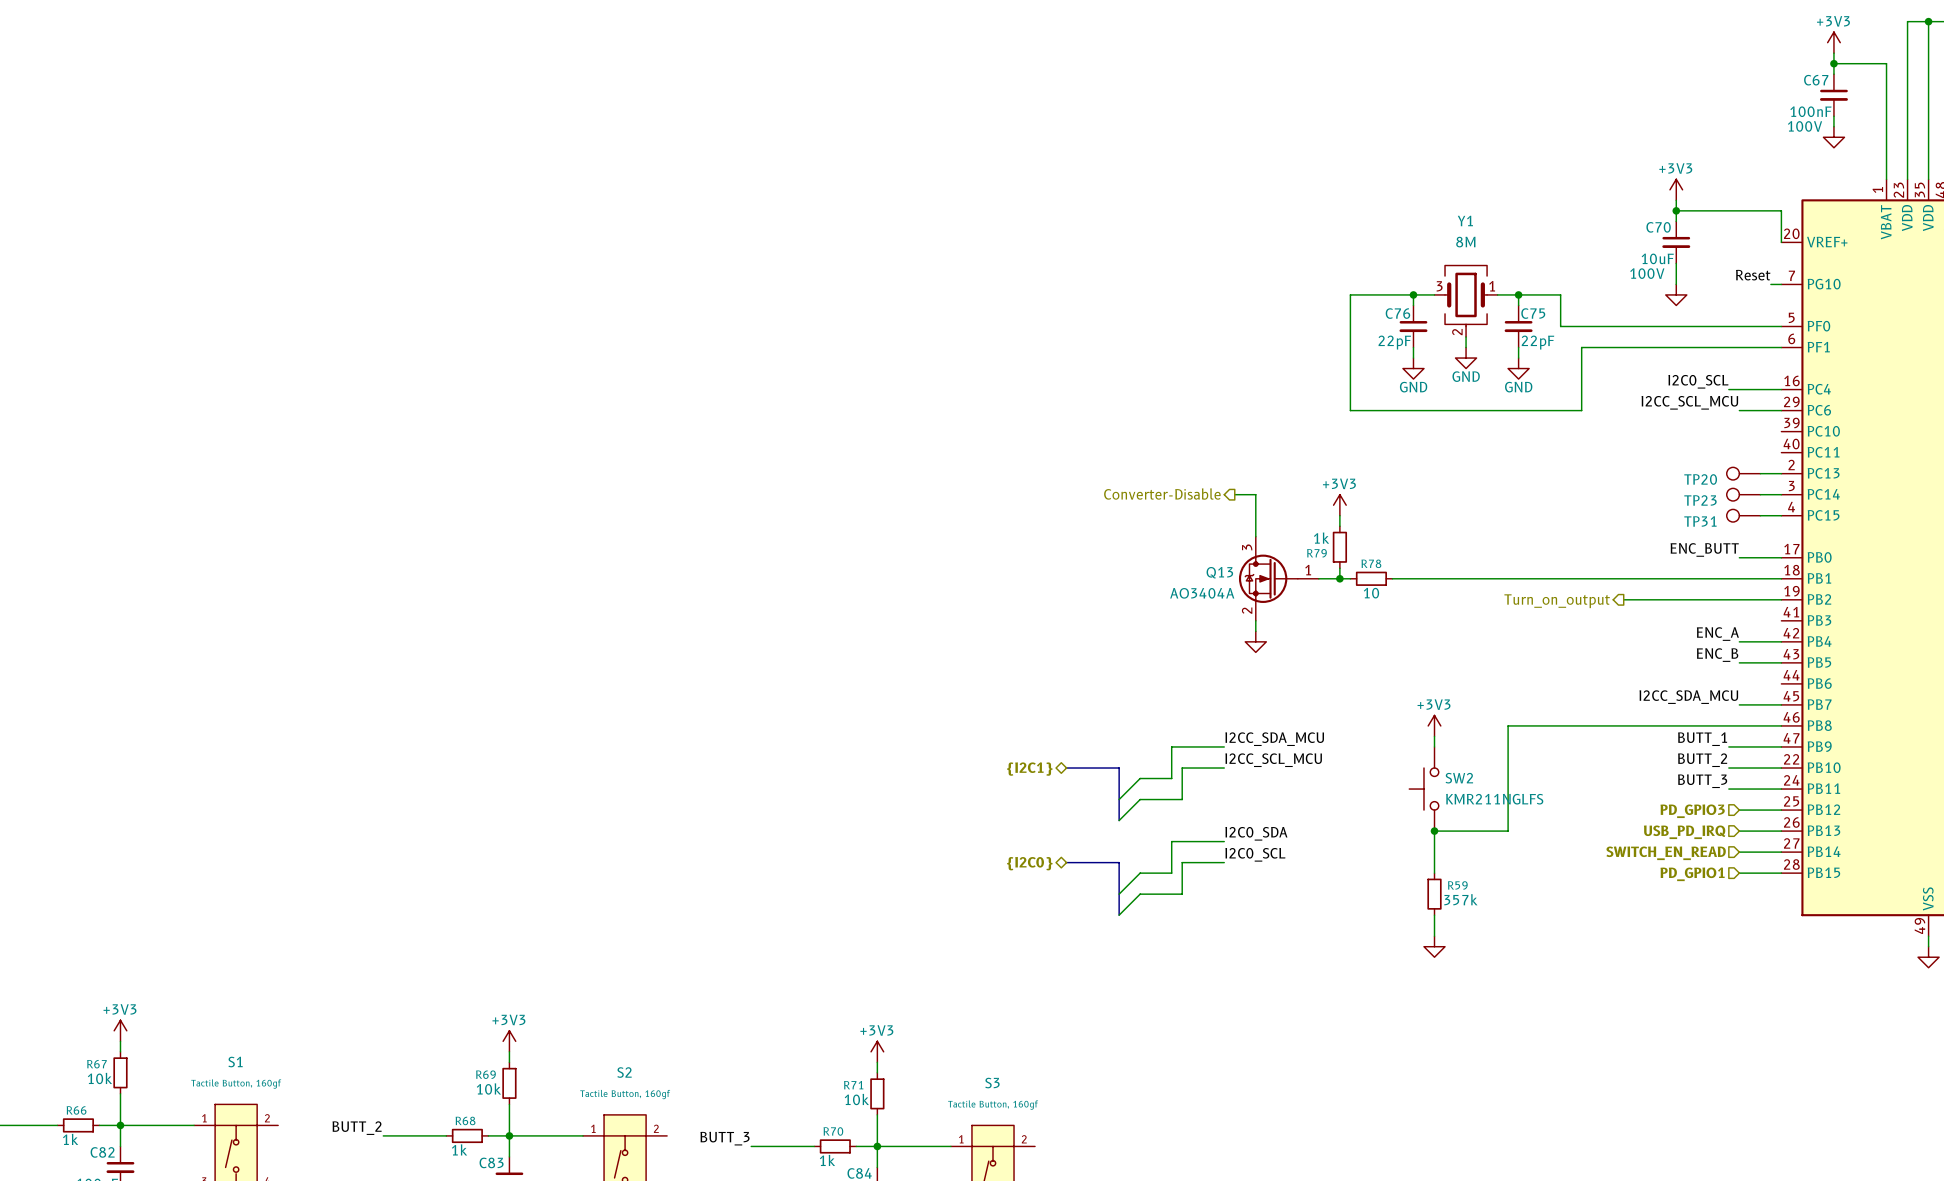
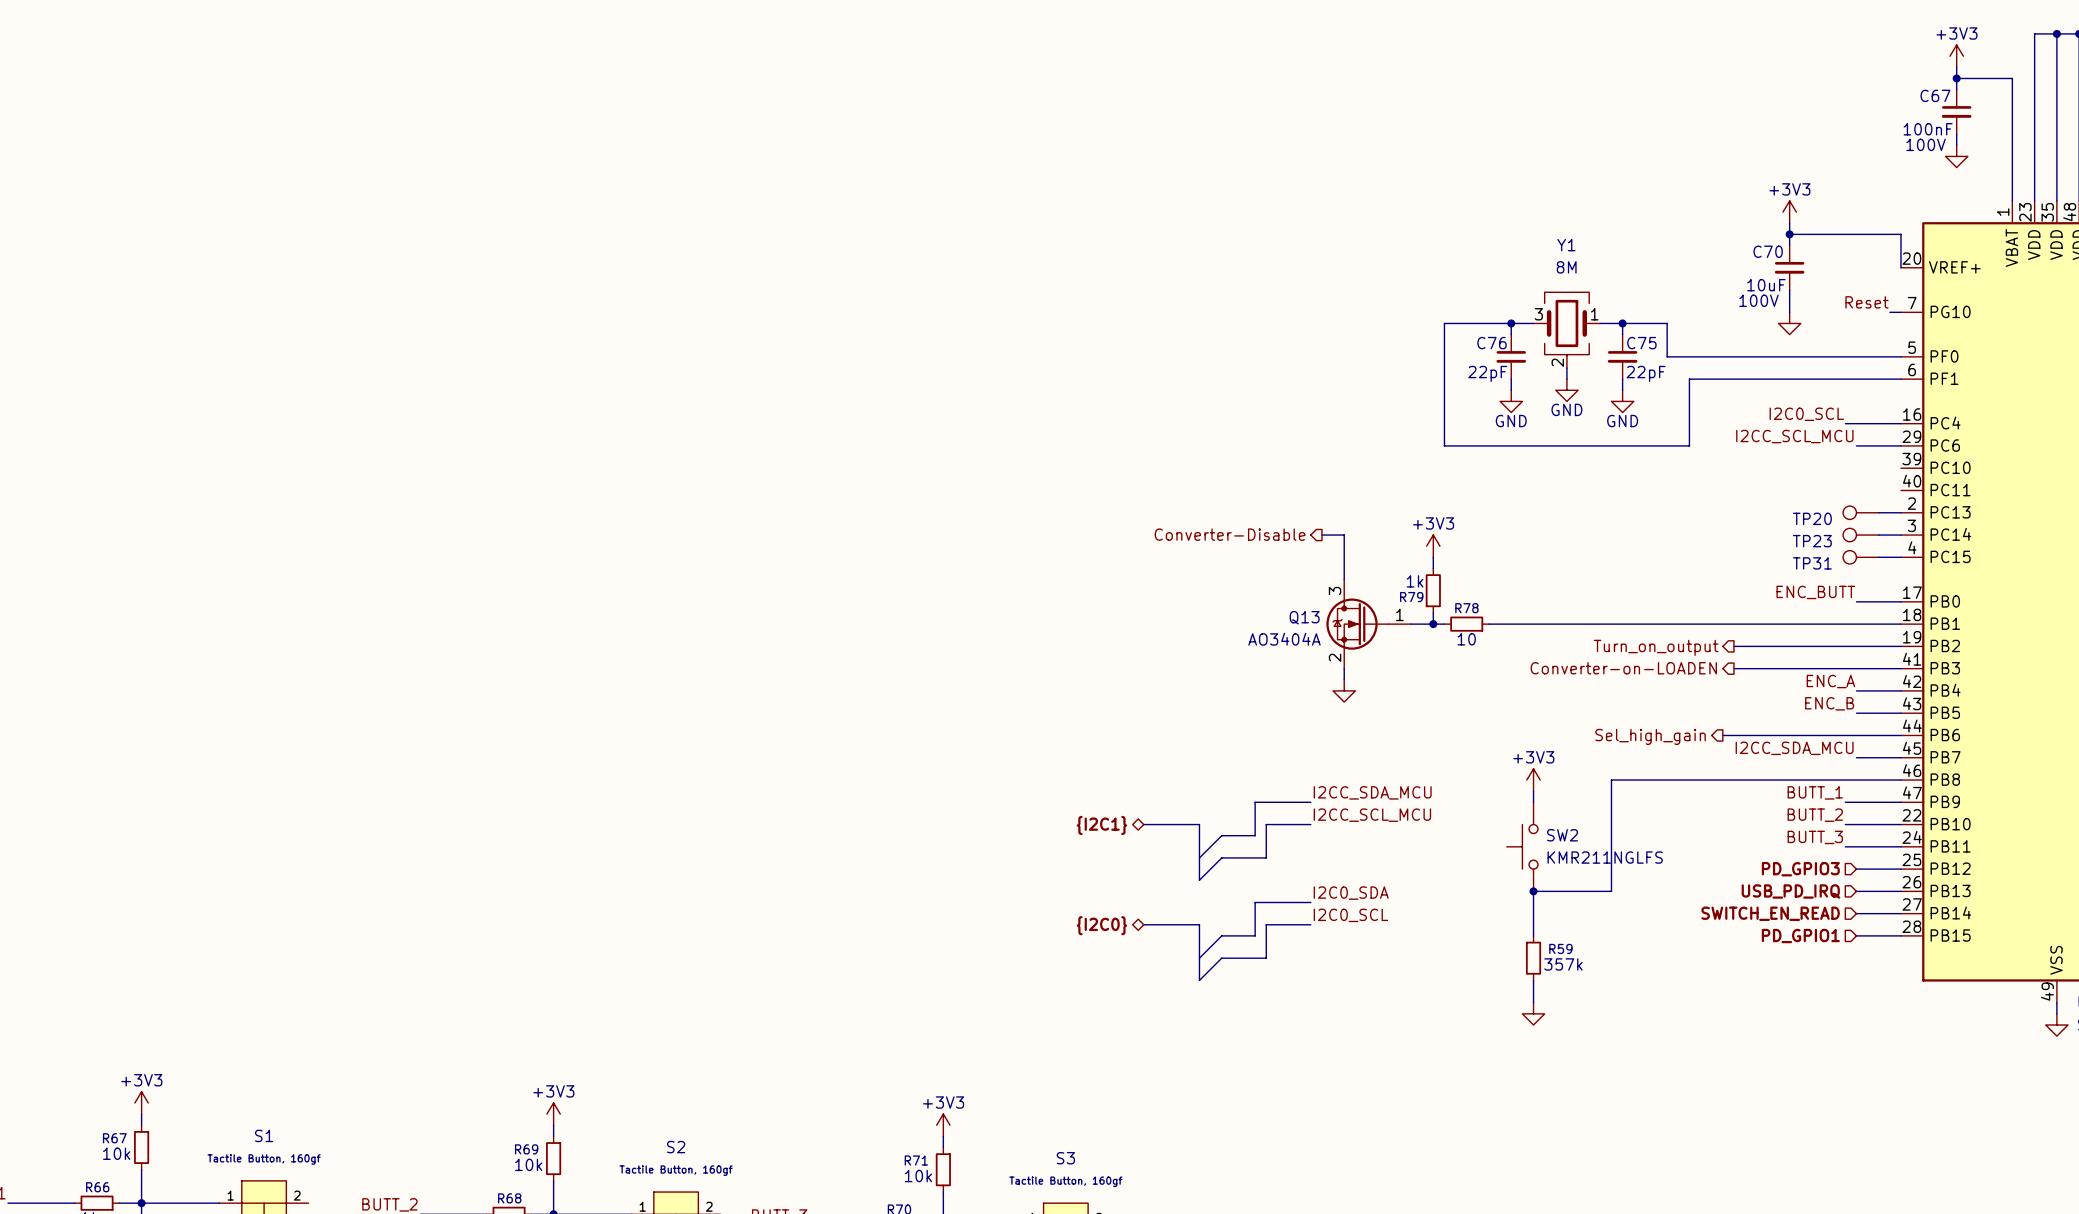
hierarchical label: none -> Converter-on-LOADEN (1623, 668)
wire: none -> (1733, 668) (1901, 668)
wire: none -> (1722, 735) (1901, 735)
hierarchical label: none -> Sel_high_gain (1650, 736)

